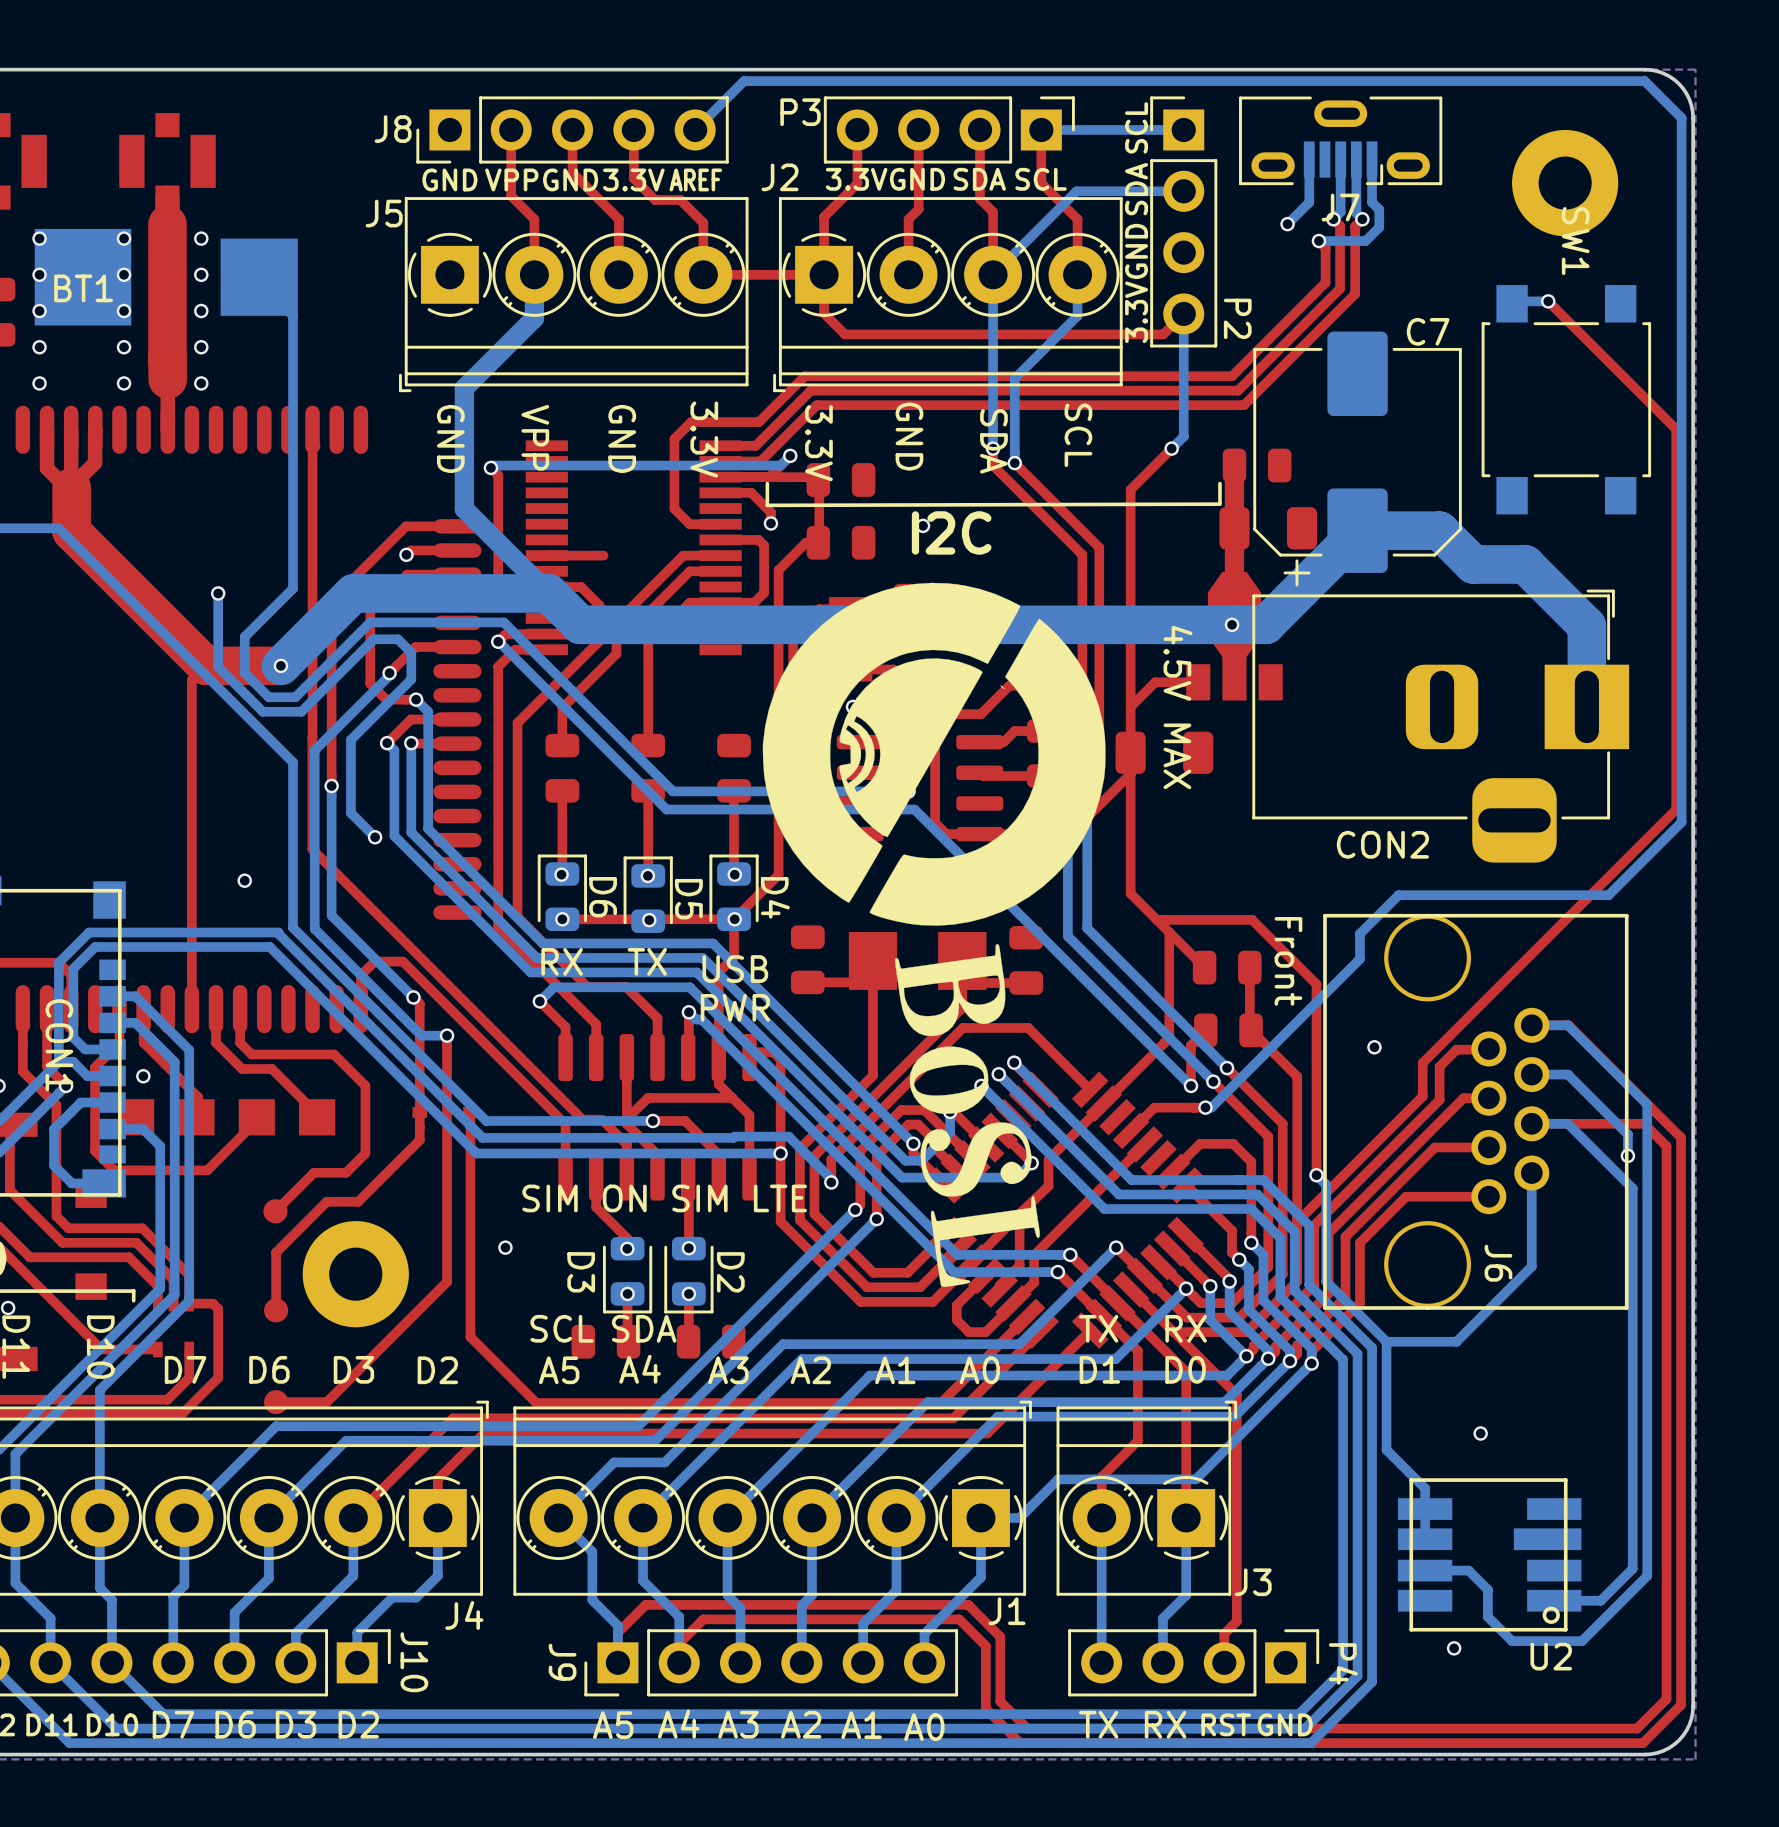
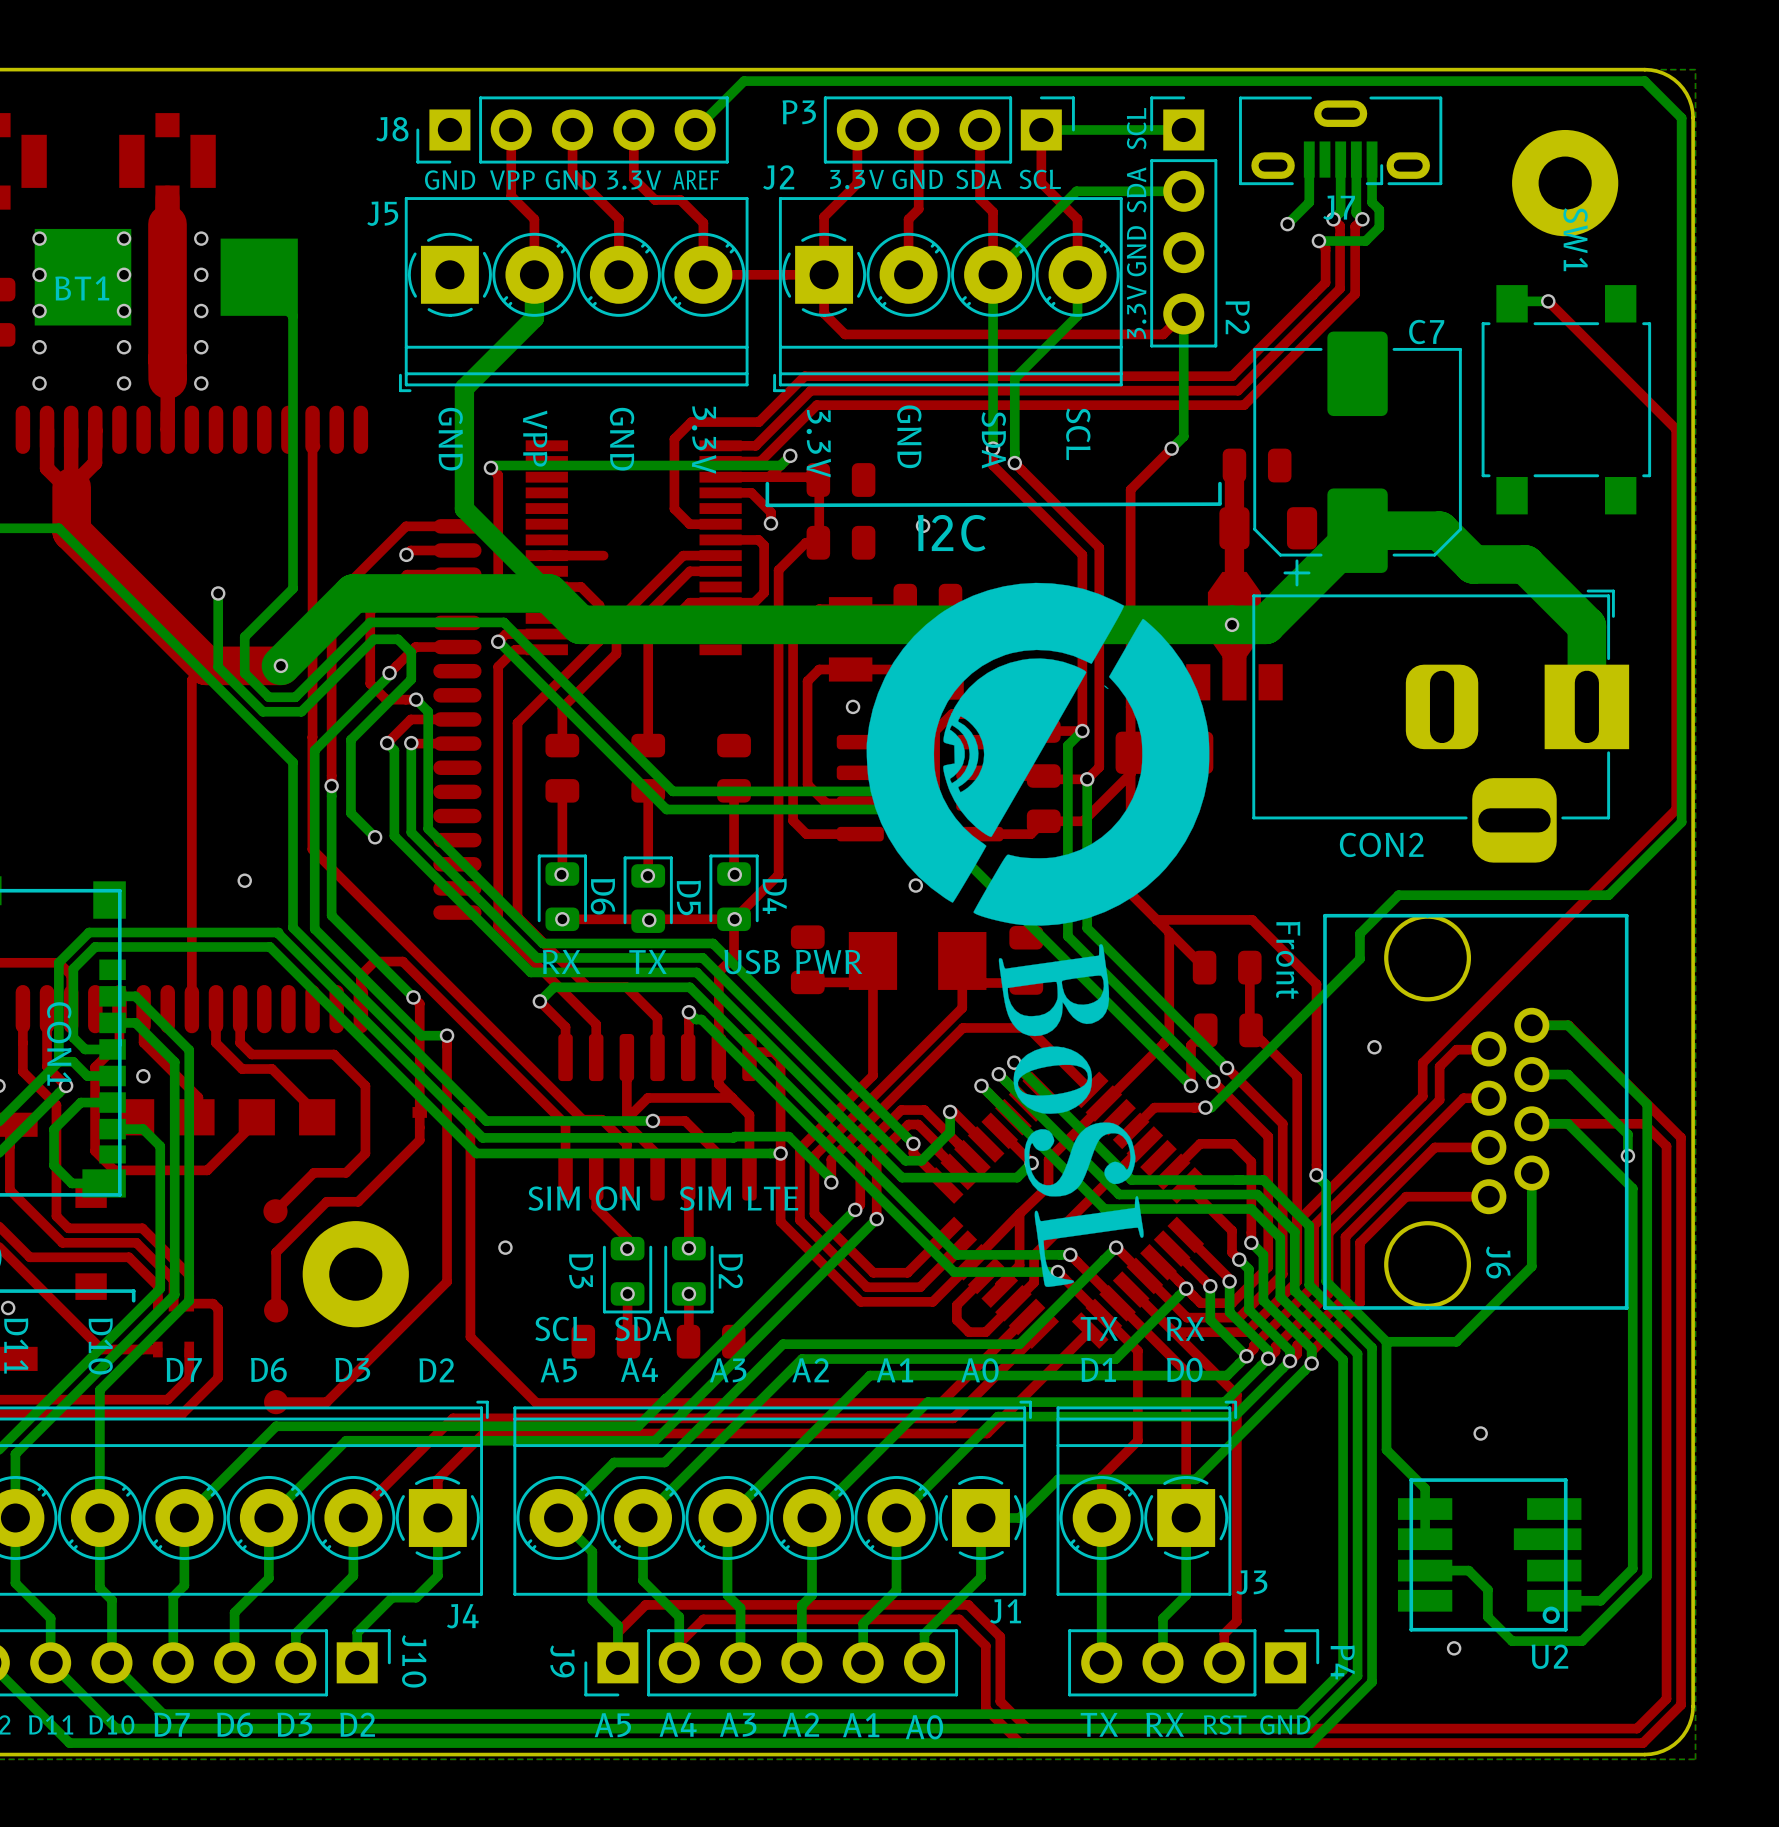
text: 4.5V MAX (1177, 707) -> none
drawing position: (934, 934) -> (1037, 934)
text: none -> USB PWR (793, 962)
text: USB (735, 969) -> none
text: PWR (735, 1007) -> none

